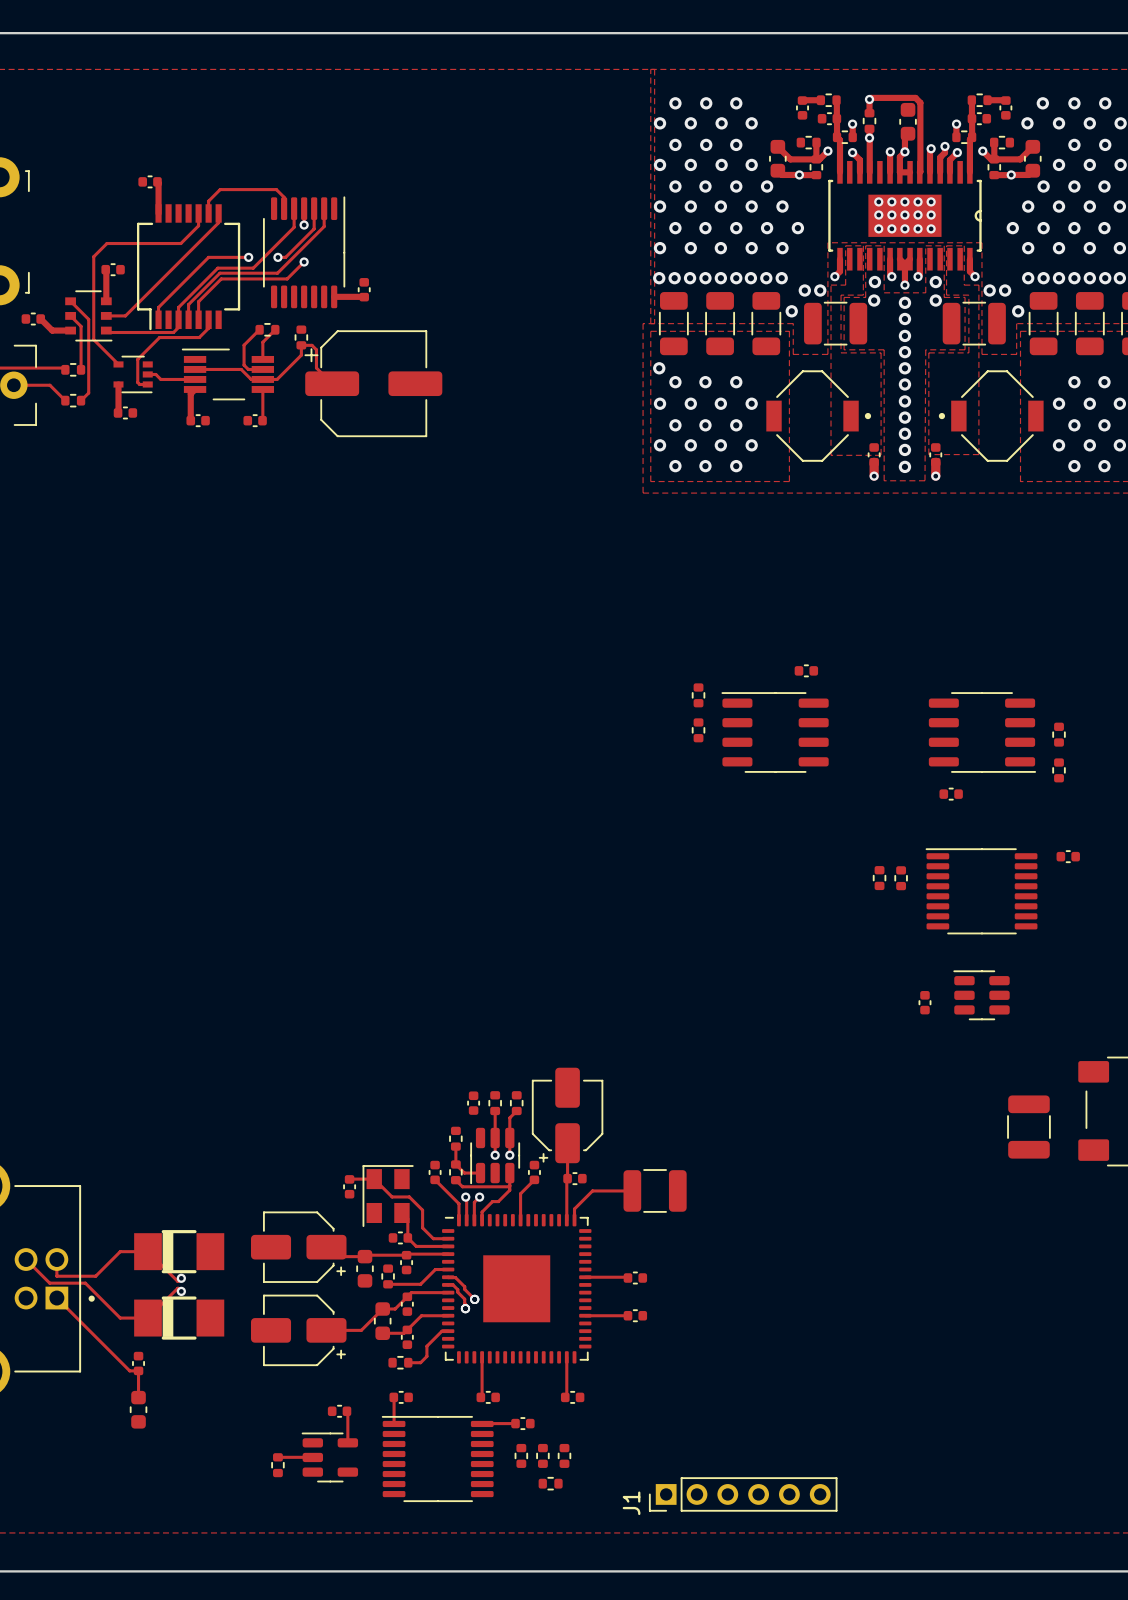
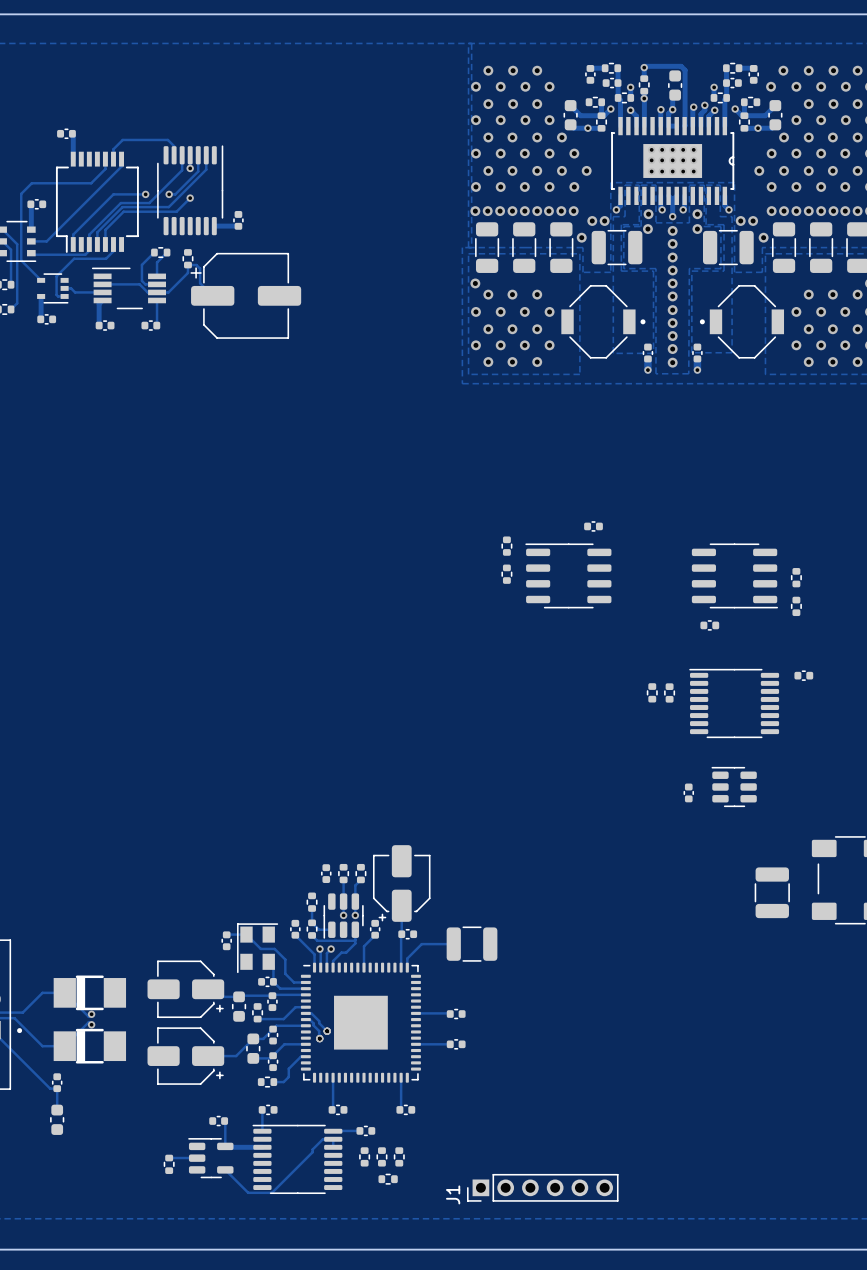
track: none -> (225, 1146) (262, 1147)
track: none -> (333, 1147) (333, 1139) (322, 1139) (272, 1192) (248, 1192) (225, 1169)

